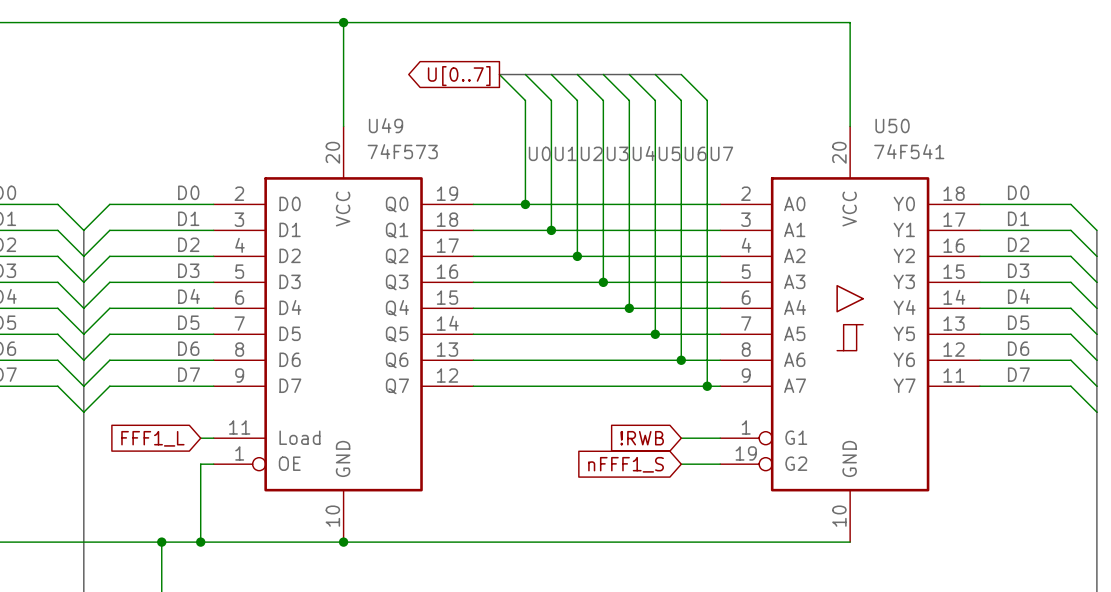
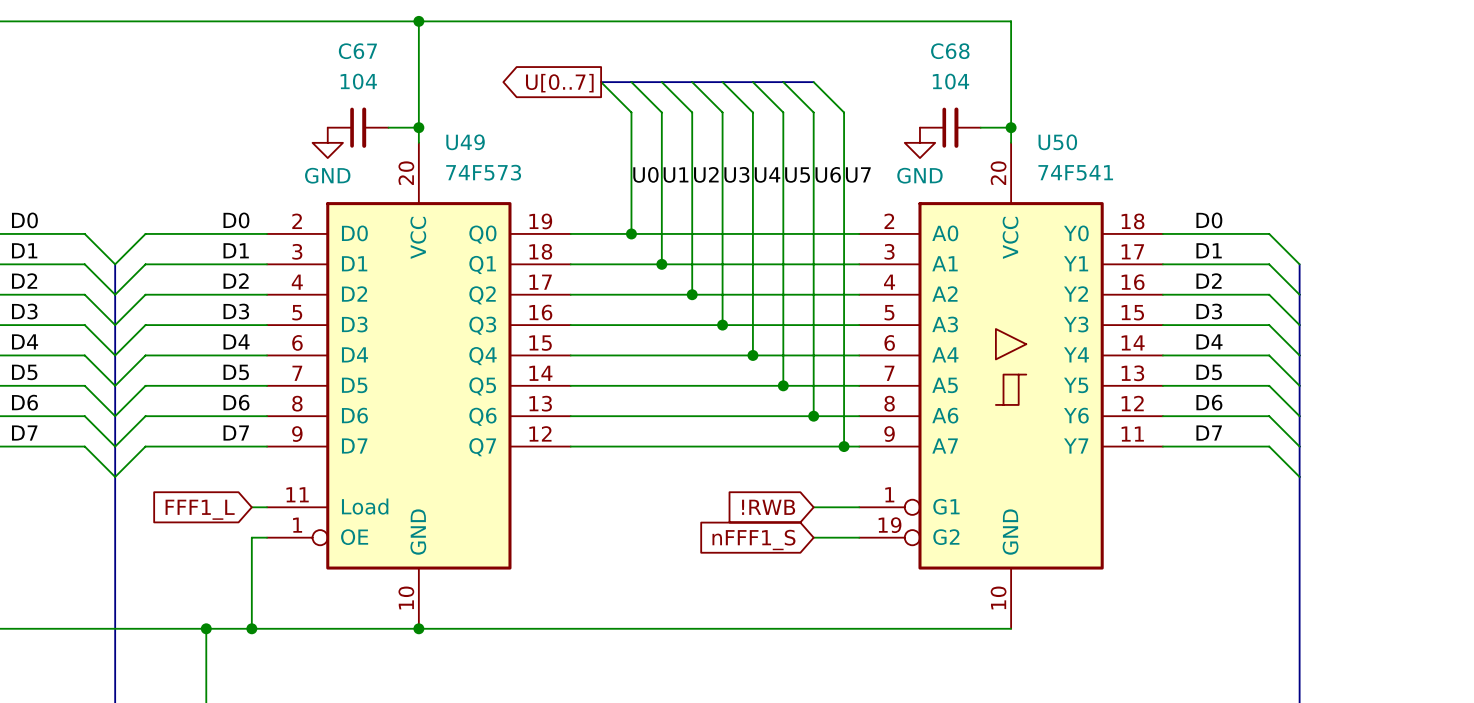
C67: none -> 104 (358, 127)
wire: none -> (388, 127) (418, 127)
junction: none -> (418, 127)
C68: none -> 104 (950, 127)
wire: none -> (980, 127) (1011, 127)
junction: none -> (1011, 127)
power symbol: none -> GND (327, 142)
power symbol: none -> GND (919, 142)

